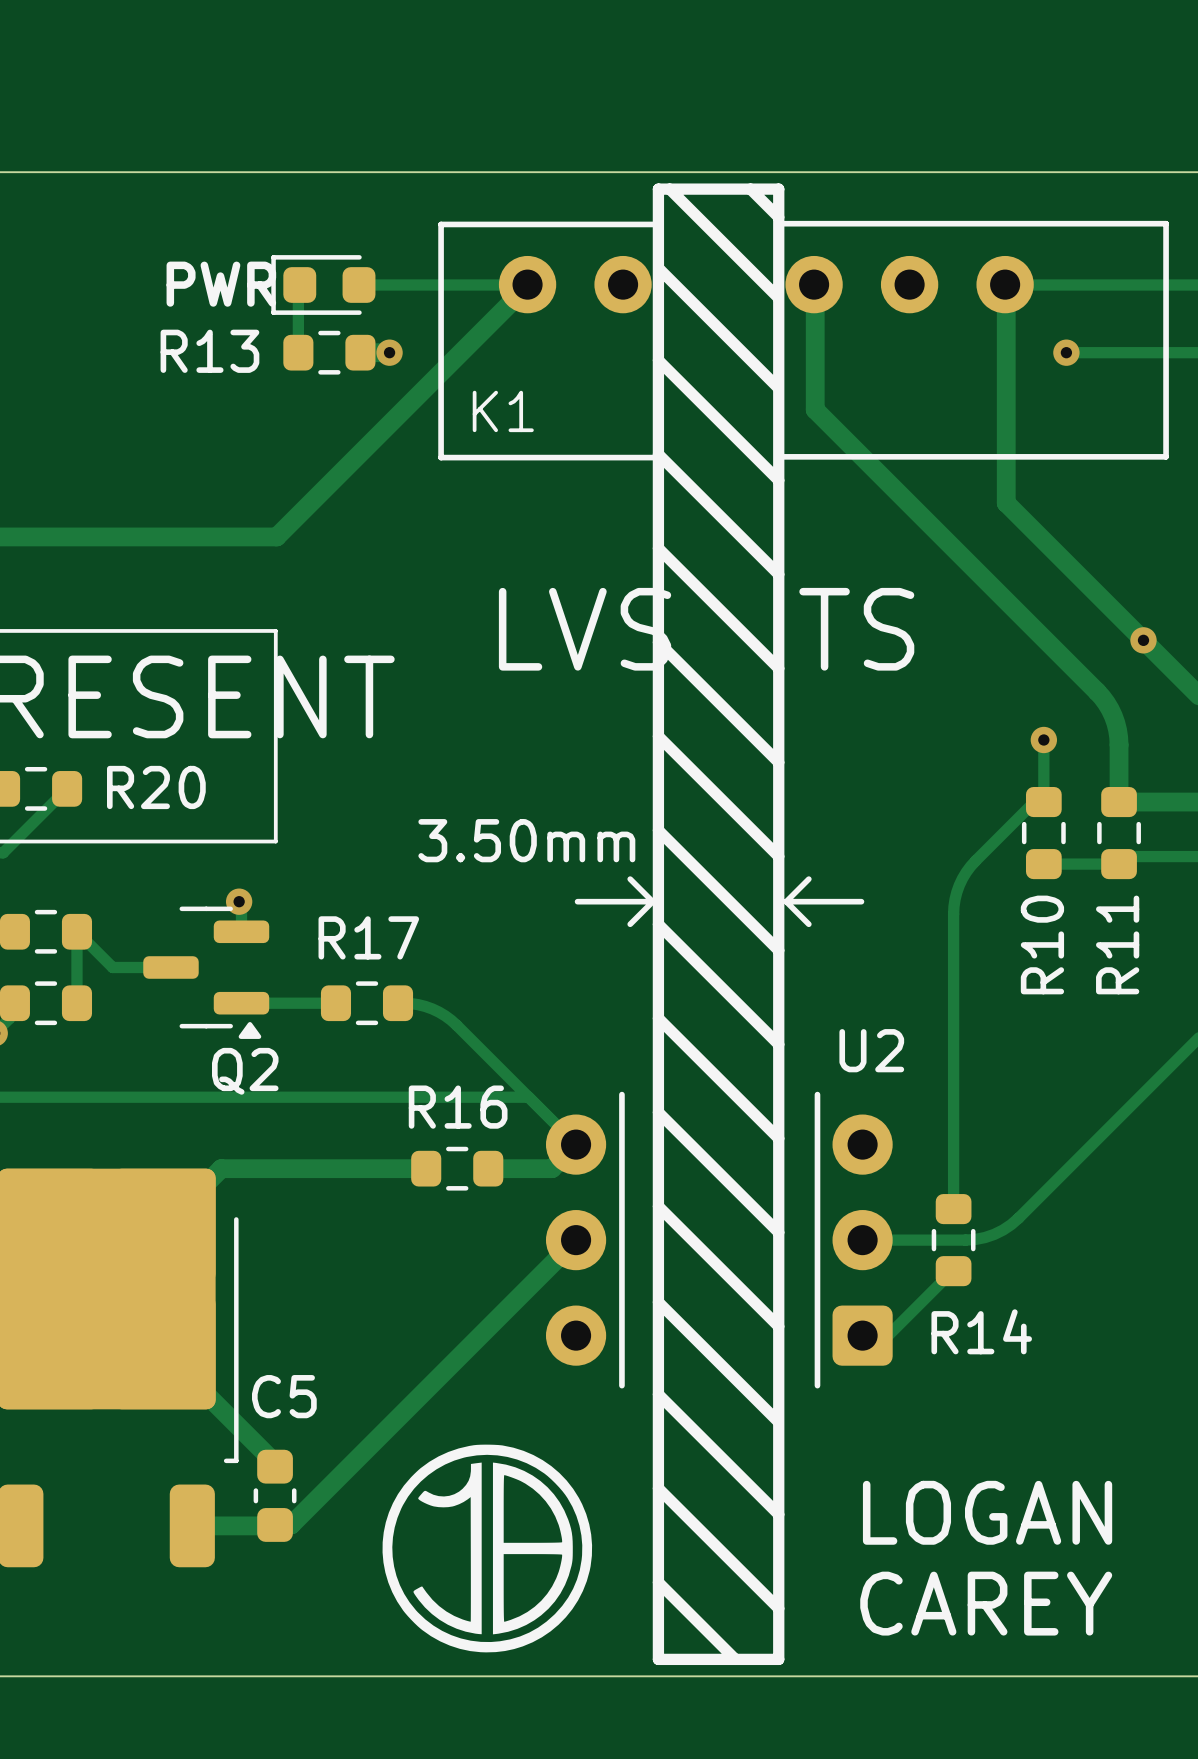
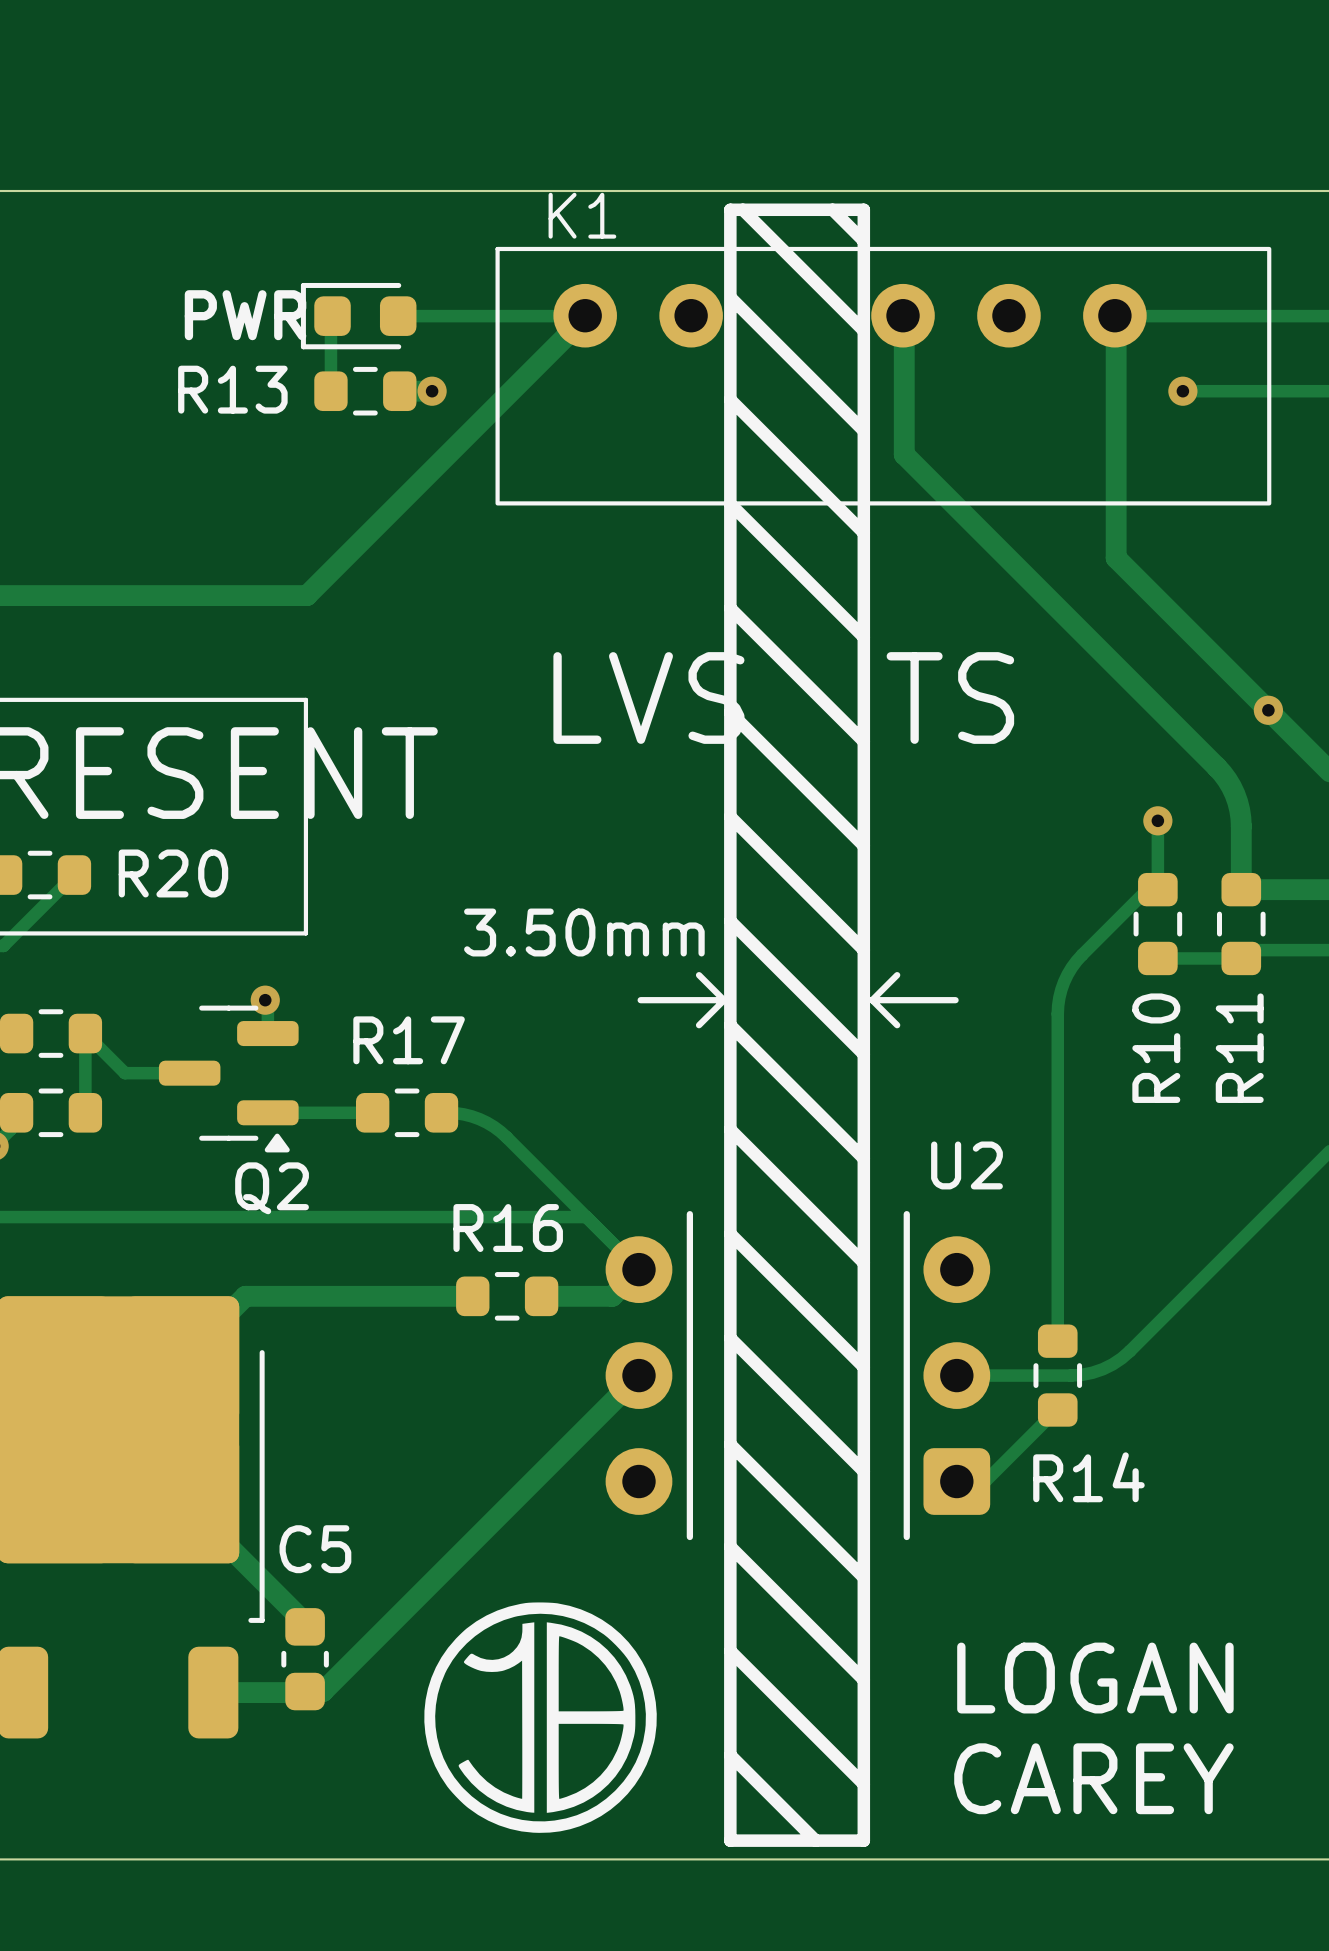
K1 footprint: [438, 220, 1169, 461] -> [495, 246, 1272, 506]
K1 name position: K1 (503, 411) -> K1 (582, 215)

